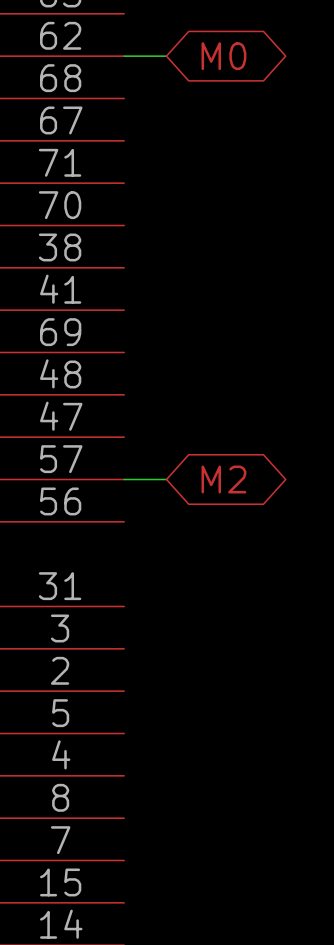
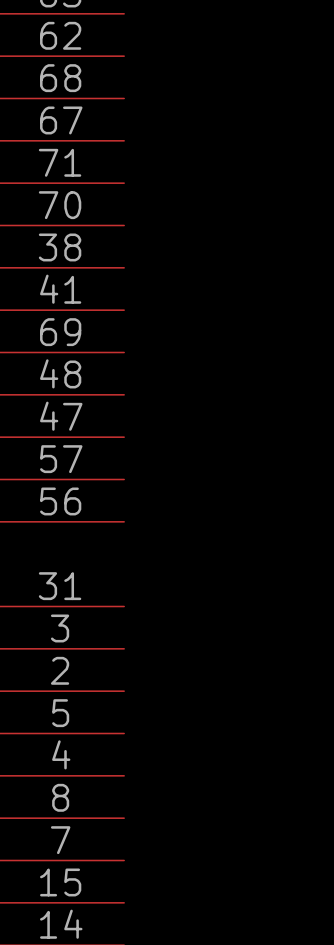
wire: (124, 56) (166, 56) -> none
global label: M0 (223, 56) -> none
wire: (124, 479) (166, 479) -> none
global label: M2 (223, 479) -> none

